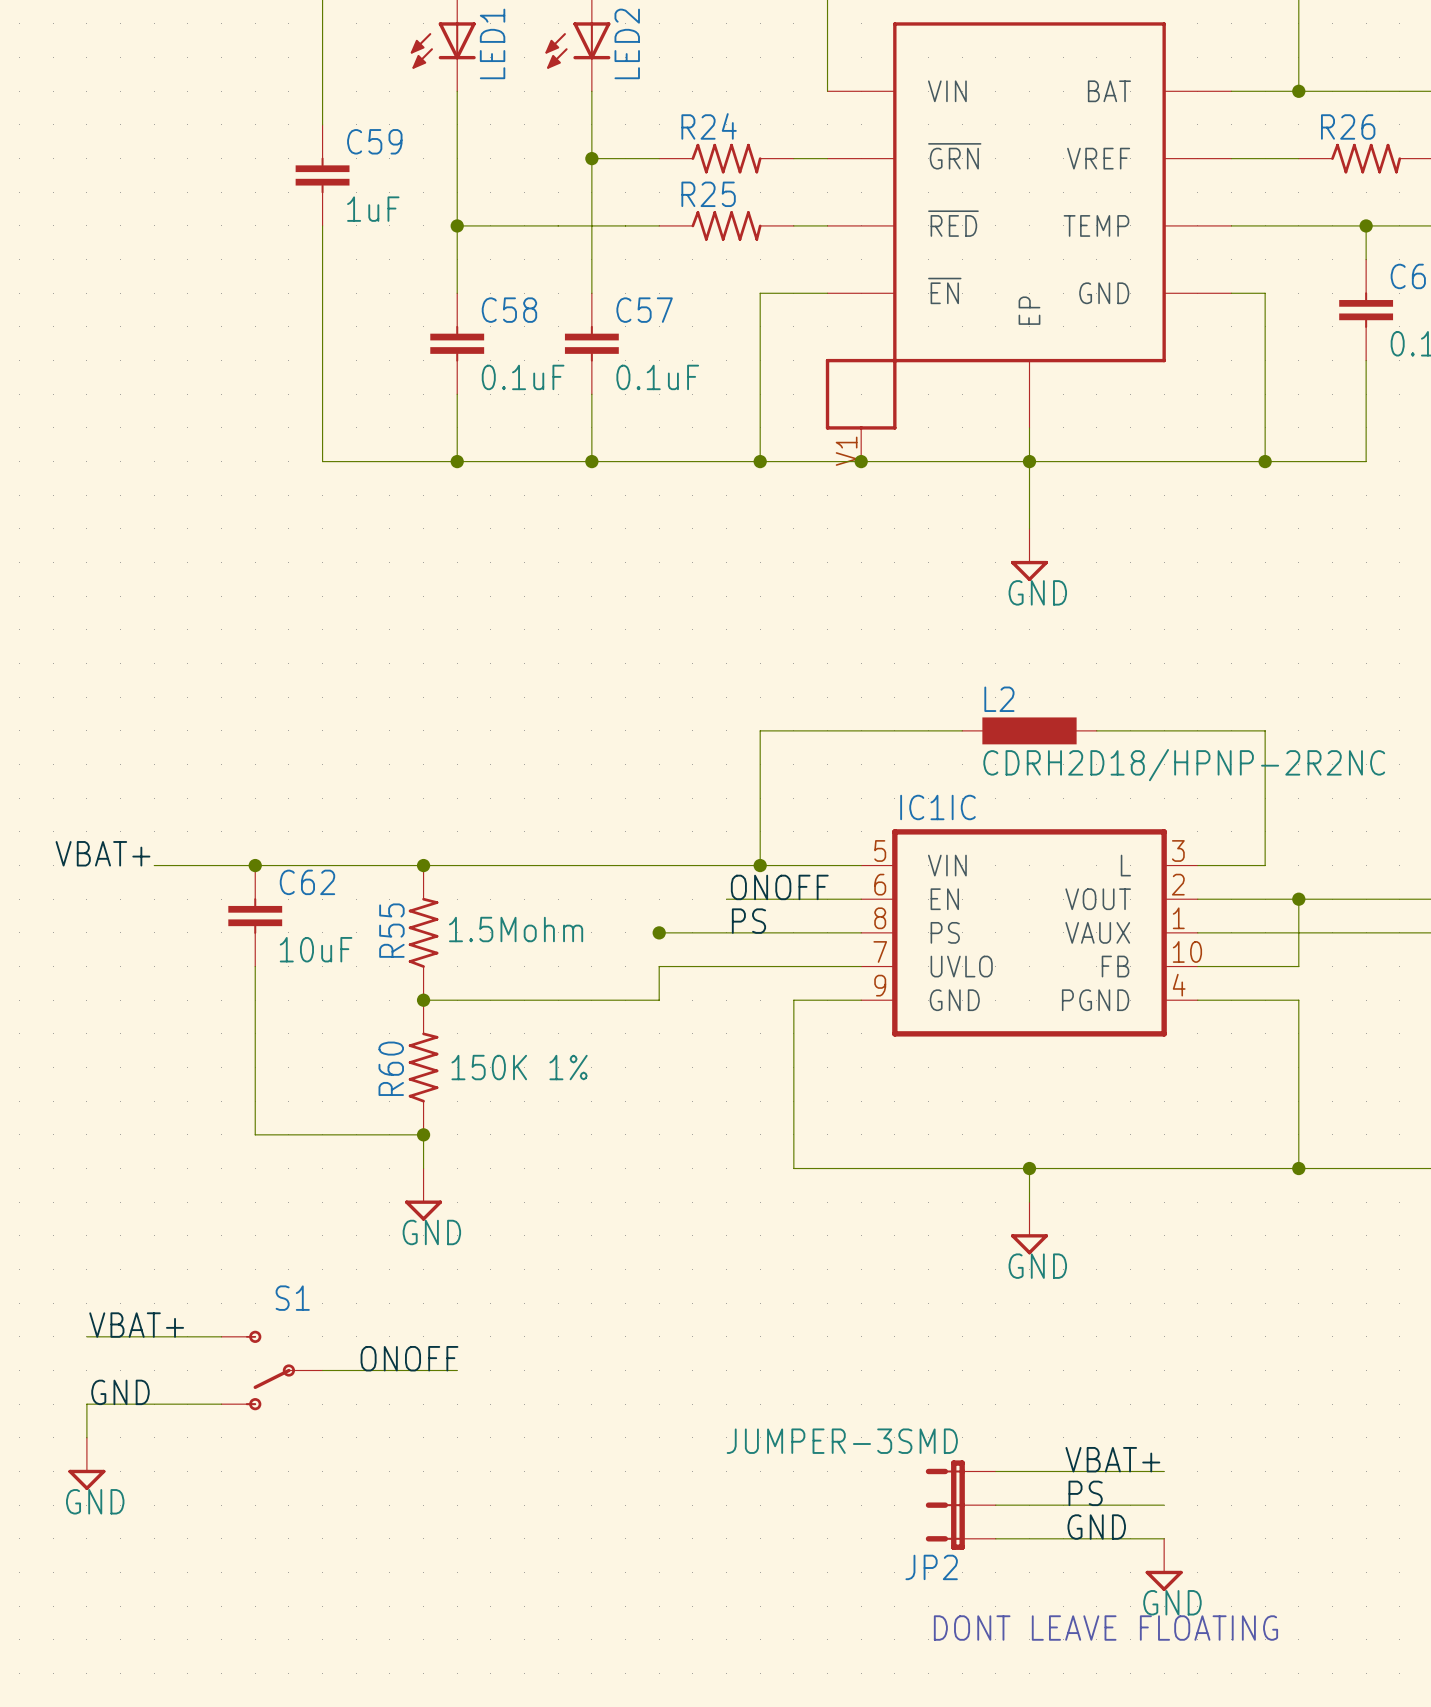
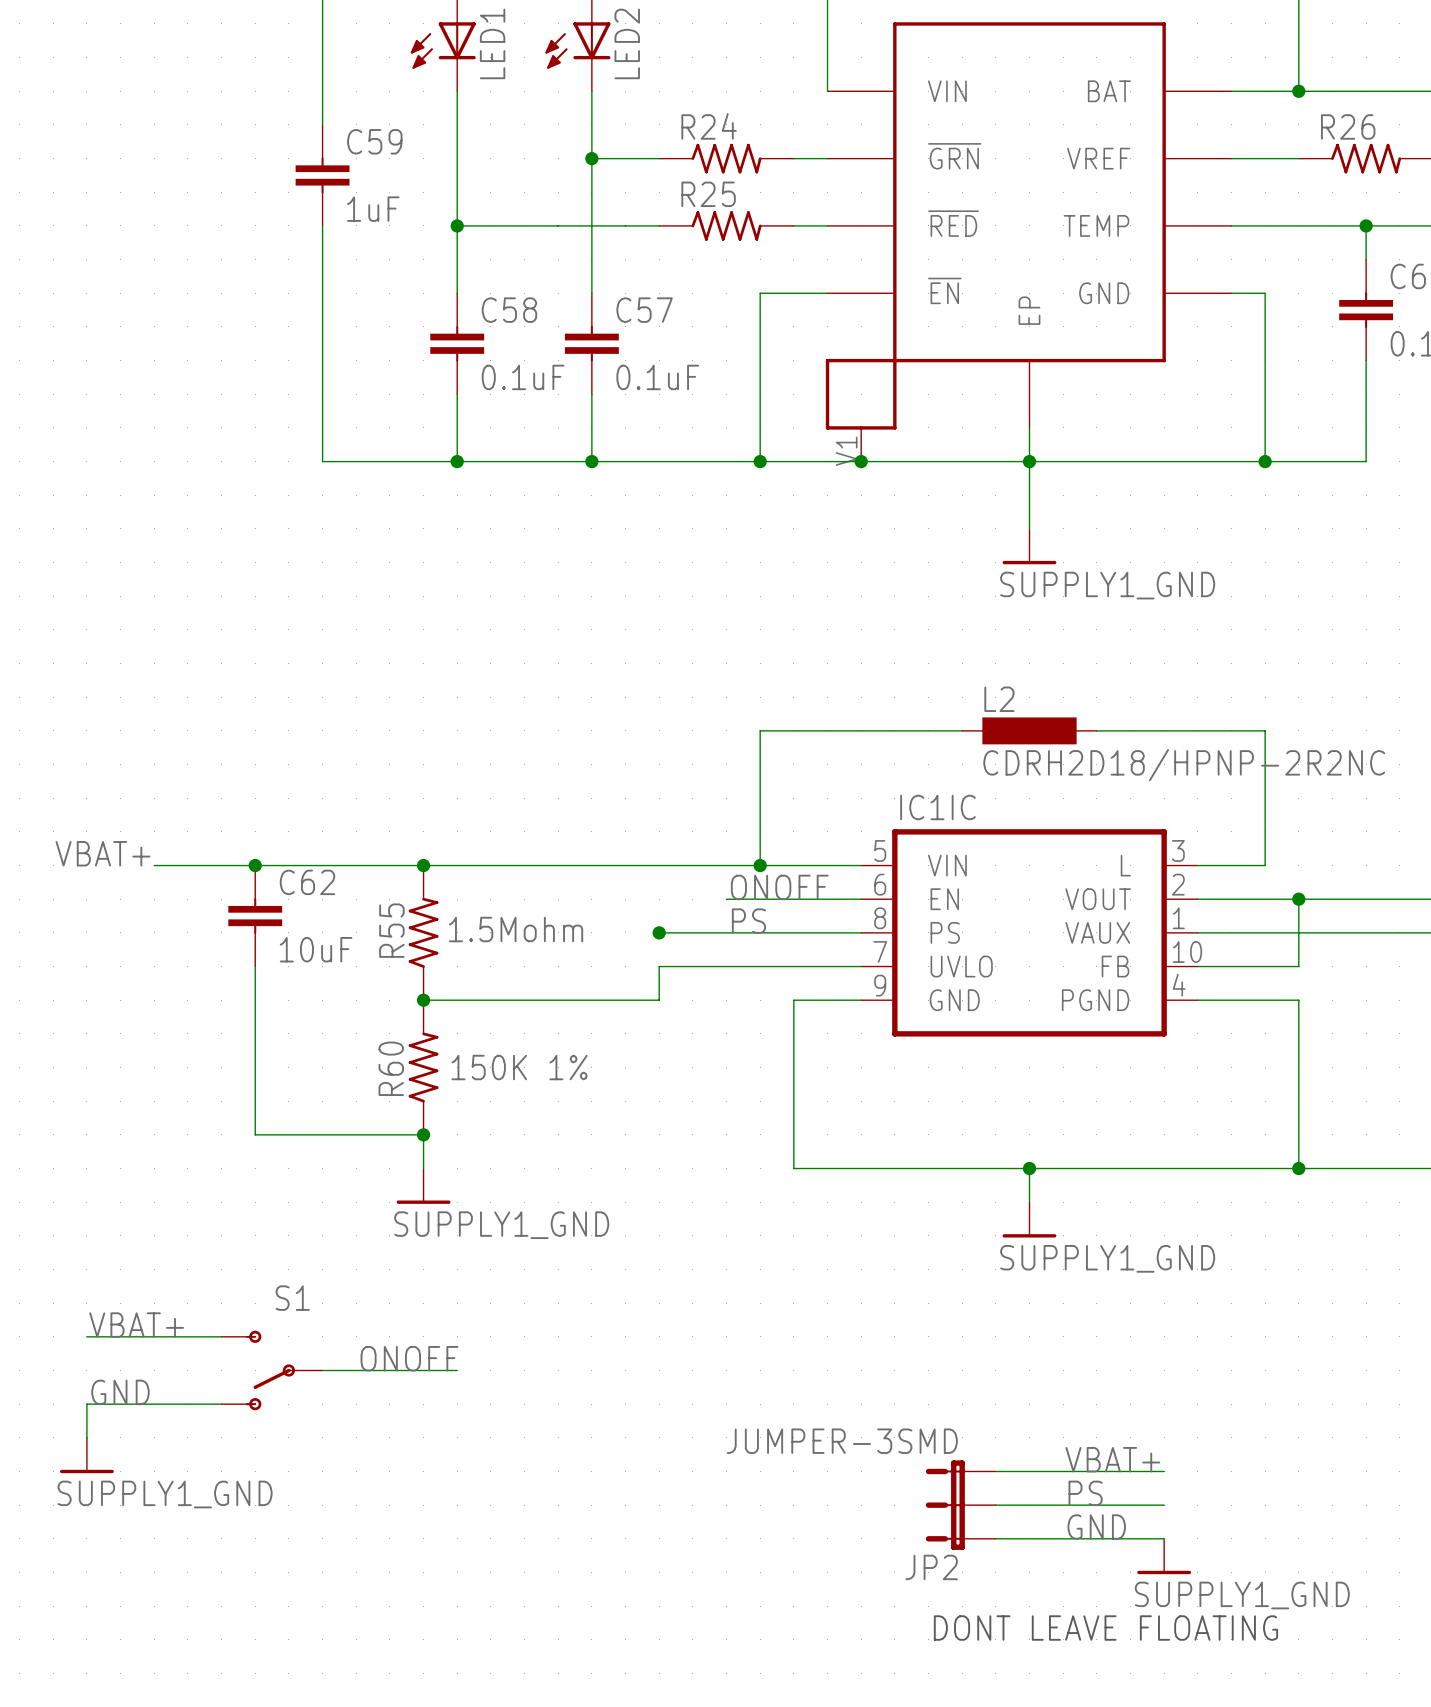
power symbol: GND (1029, 555) -> SUPPLY1_GND (1029, 546)
power symbol: GND (423, 1194) -> SUPPLY1_GND (423, 1186)
power symbol: GND (1029, 1228) -> SUPPLY1_GND (1029, 1219)
power symbol: GND (86, 1463) -> SUPPLY1_GND (86, 1455)
power symbol: GND (1164, 1564) -> SUPPLY1_GND (1164, 1556)

